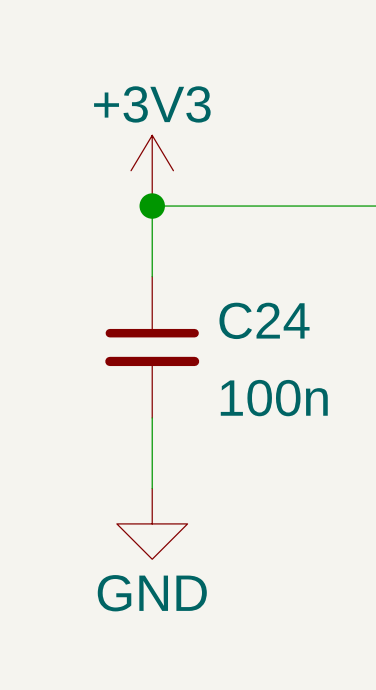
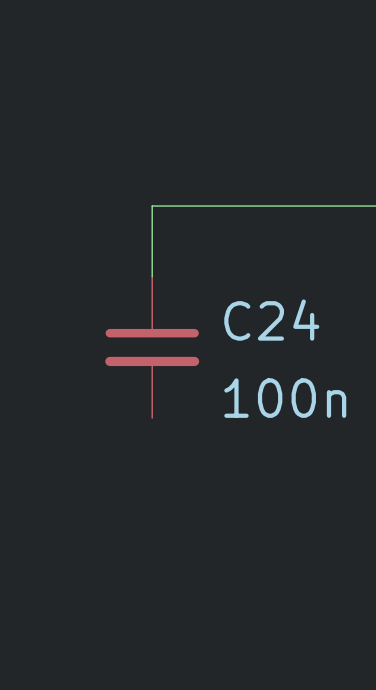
power symbol: +3V3 (152, 170) -> none
junction: (152, 206) -> none
wire: (152, 417) (152, 488) -> none
power symbol: GND (152, 523) -> none

